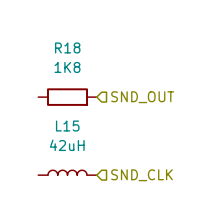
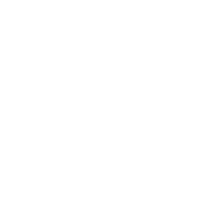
R18: 1K8 (67, 97) -> none
hierarchical label: SND_OUT (142, 97) -> none
L15: 42uH (67, 172) -> none
hierarchical label: SND_CLK (141, 175) -> none

